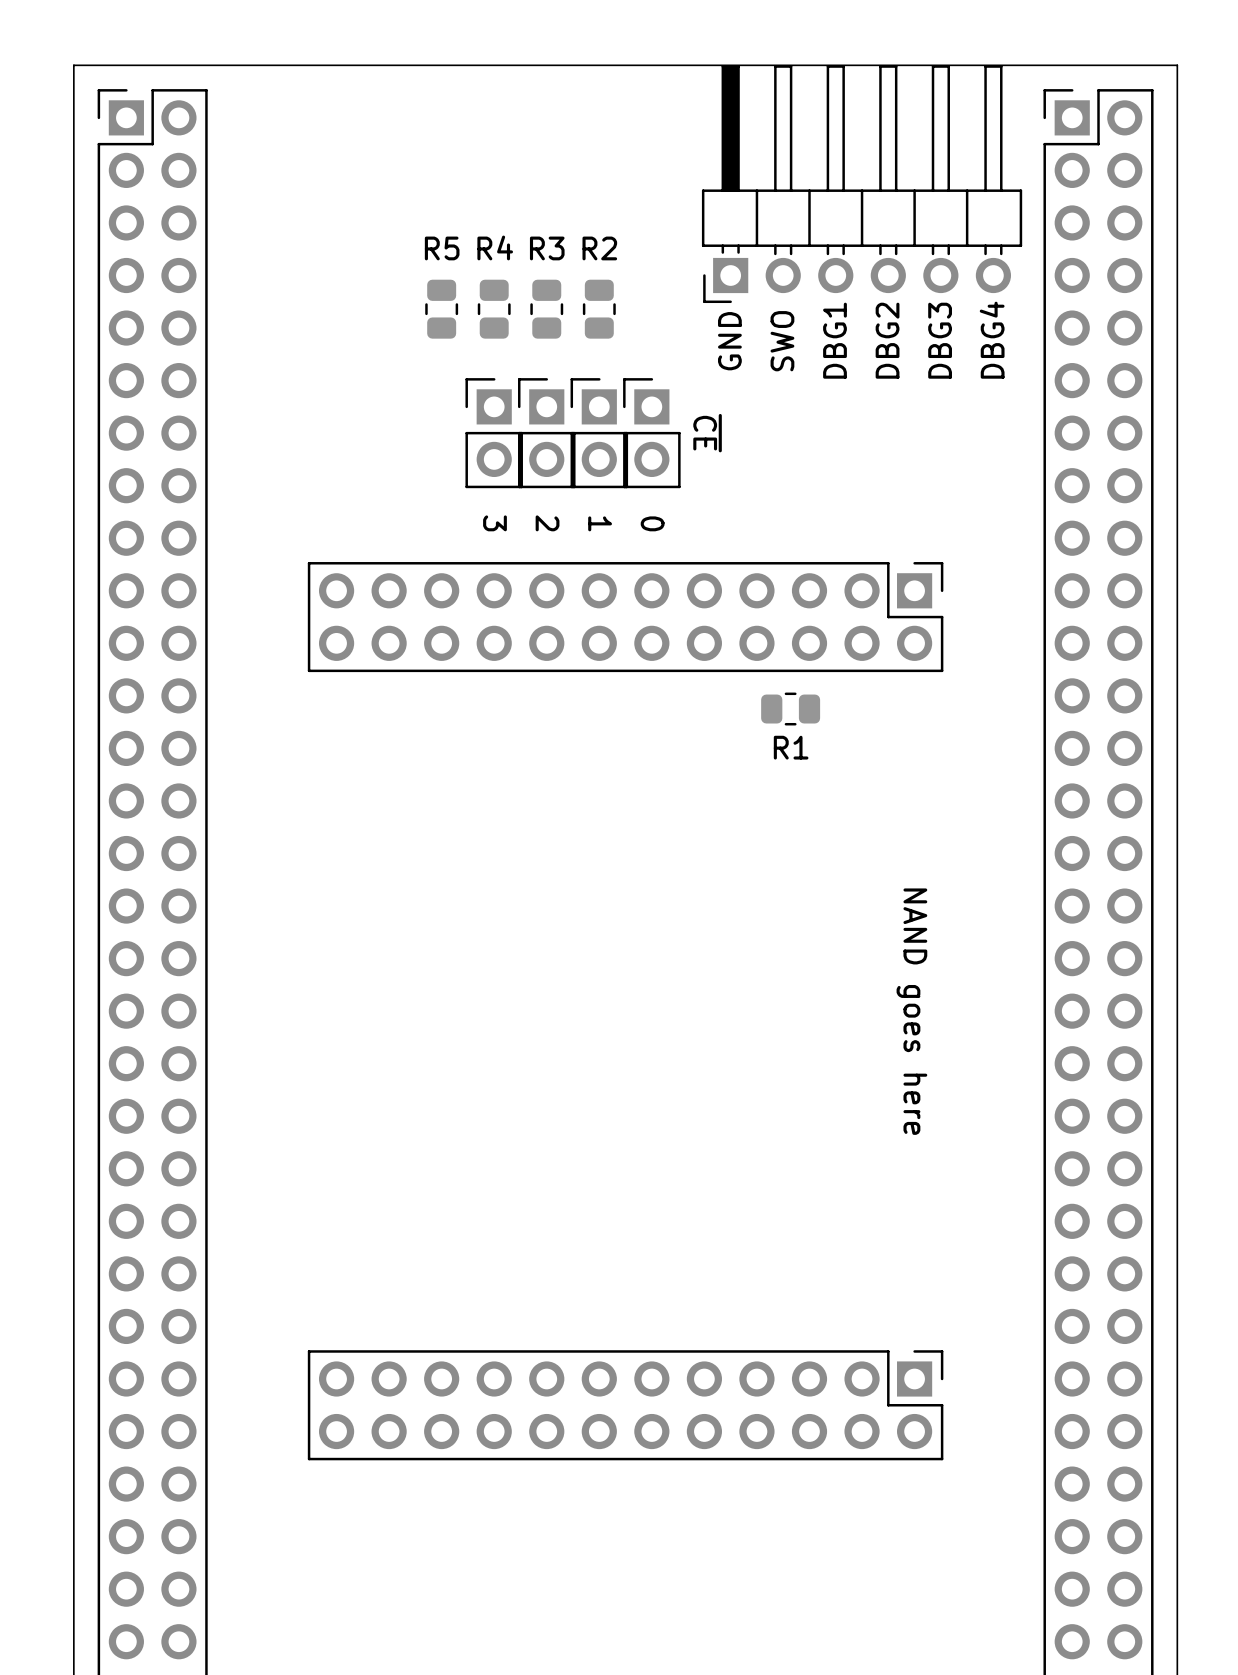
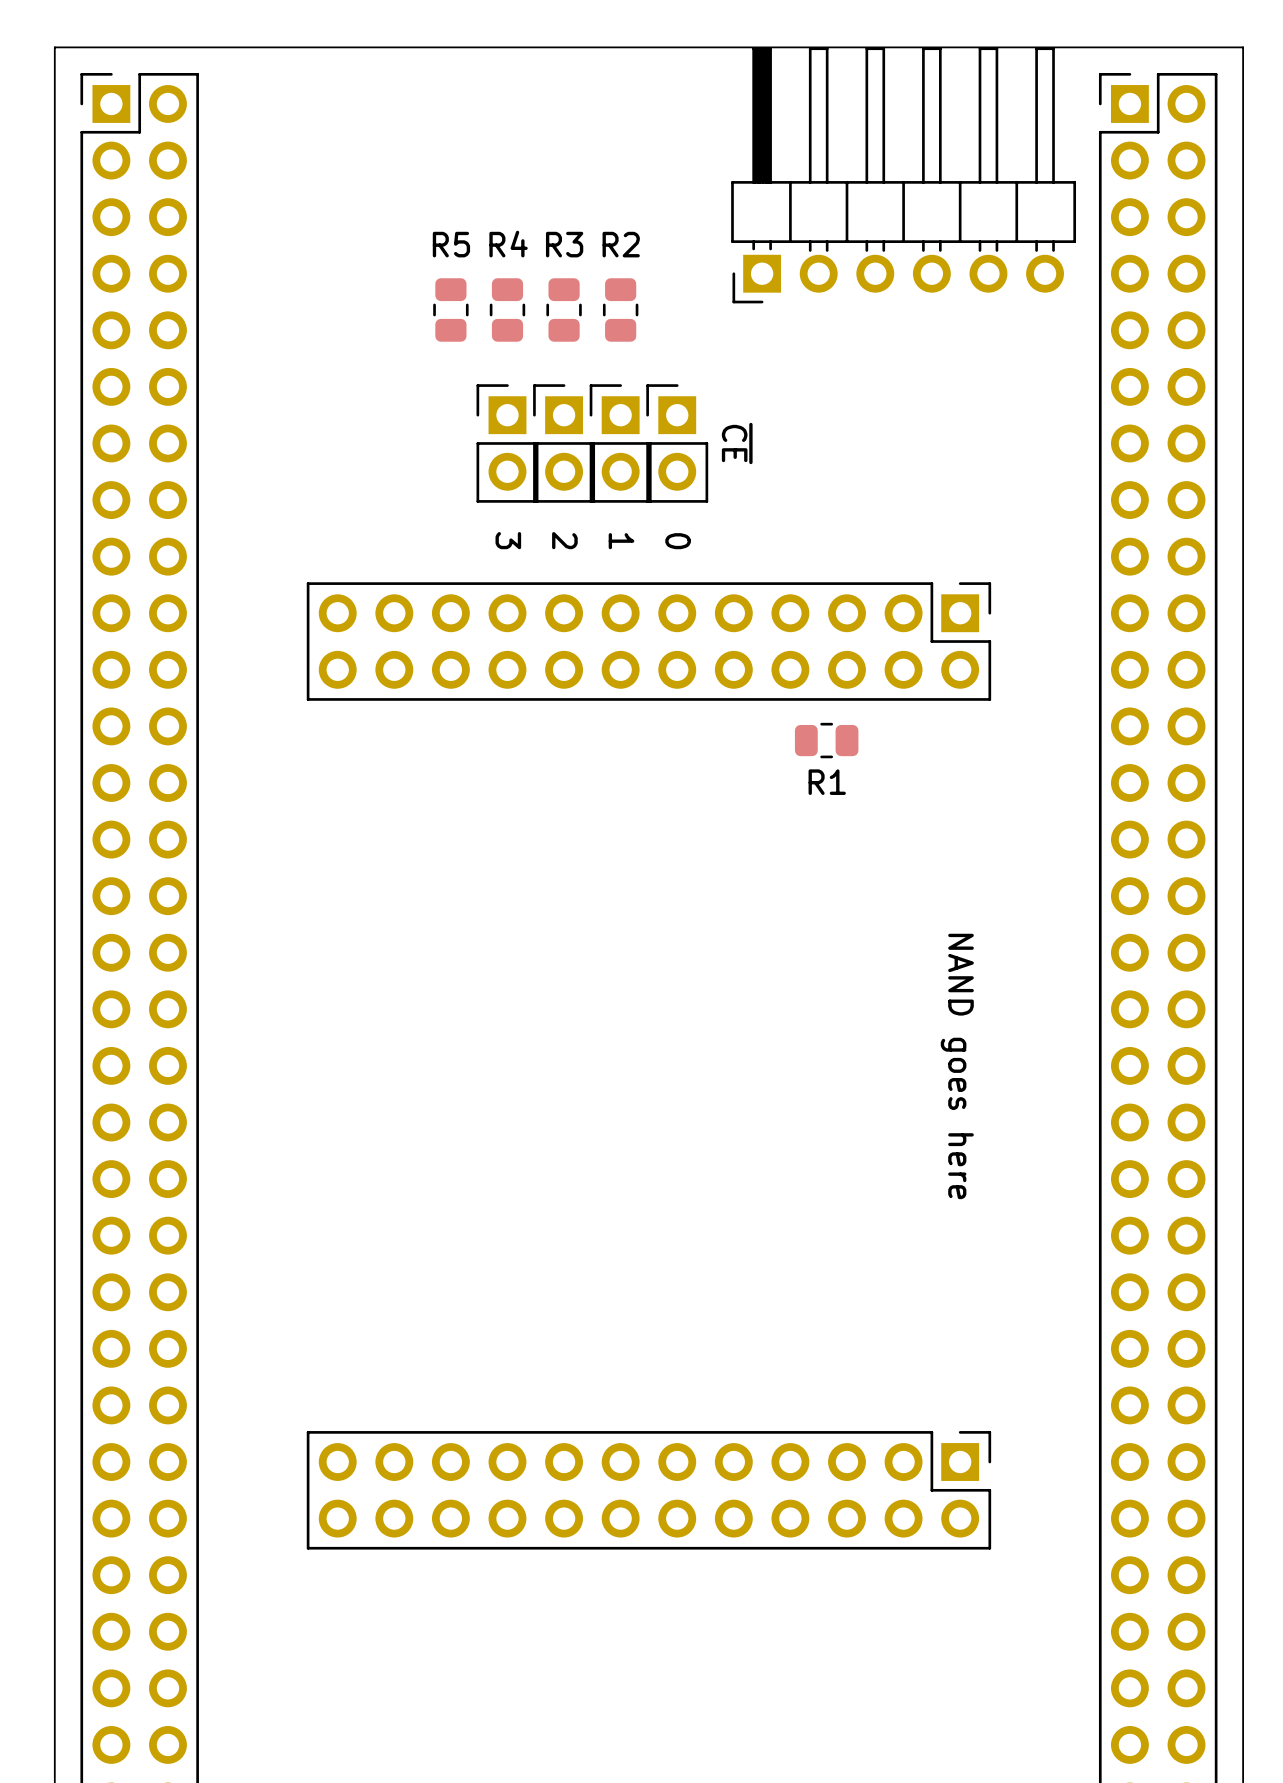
text: DBG1 (835, 340) -> none
text: DBG2 (887, 340) -> none
text: DBG3 (940, 340) -> none
text: DBG4 (992, 340) -> none
text: GND (729, 341) -> none
text: SWO (782, 341) -> none

